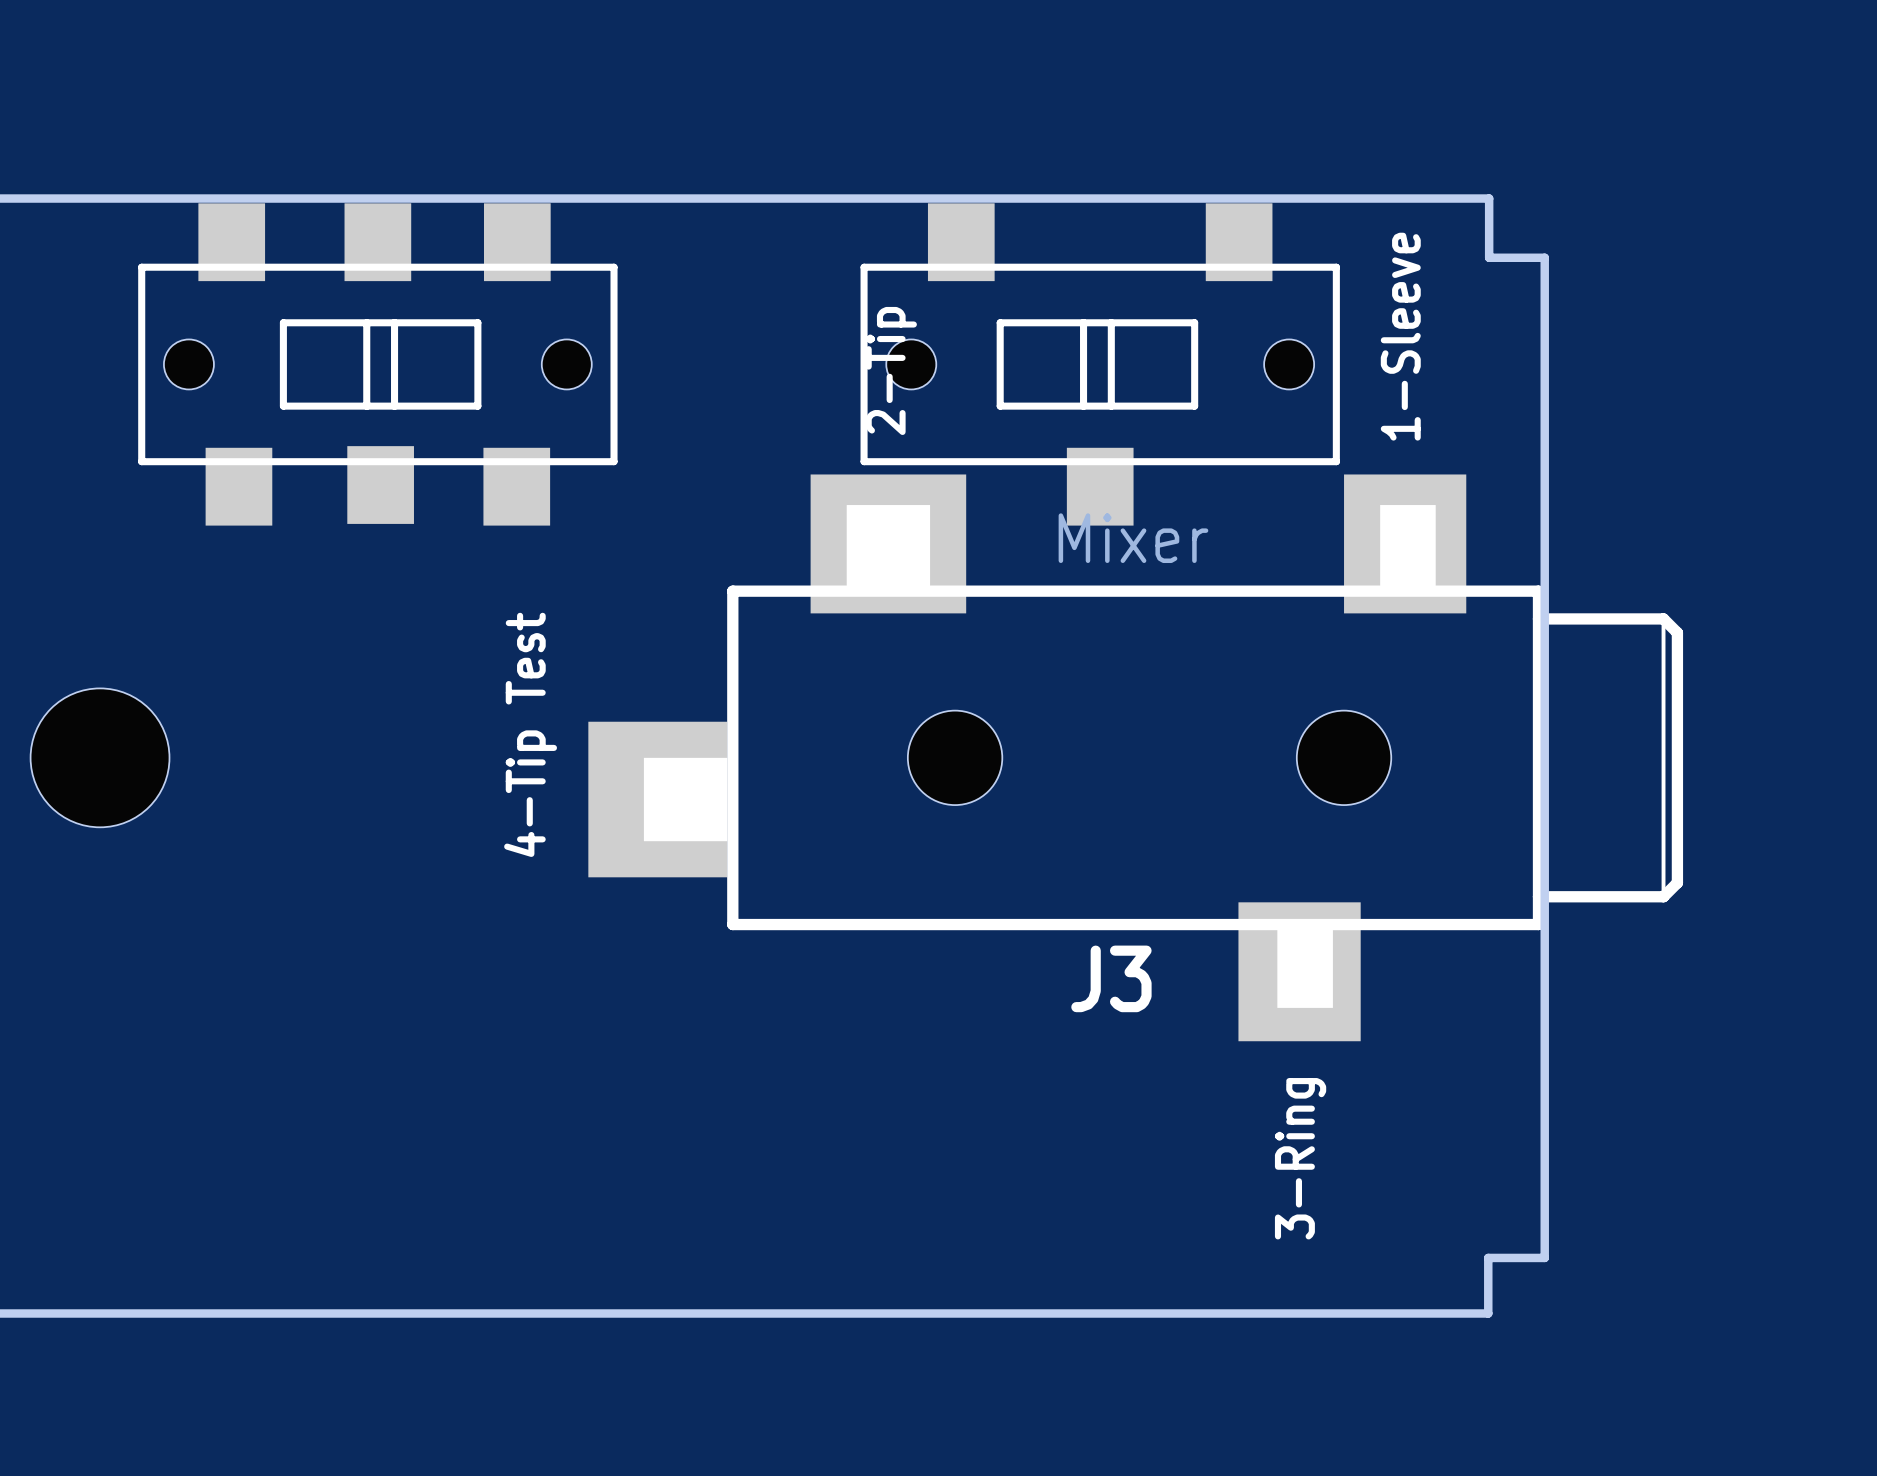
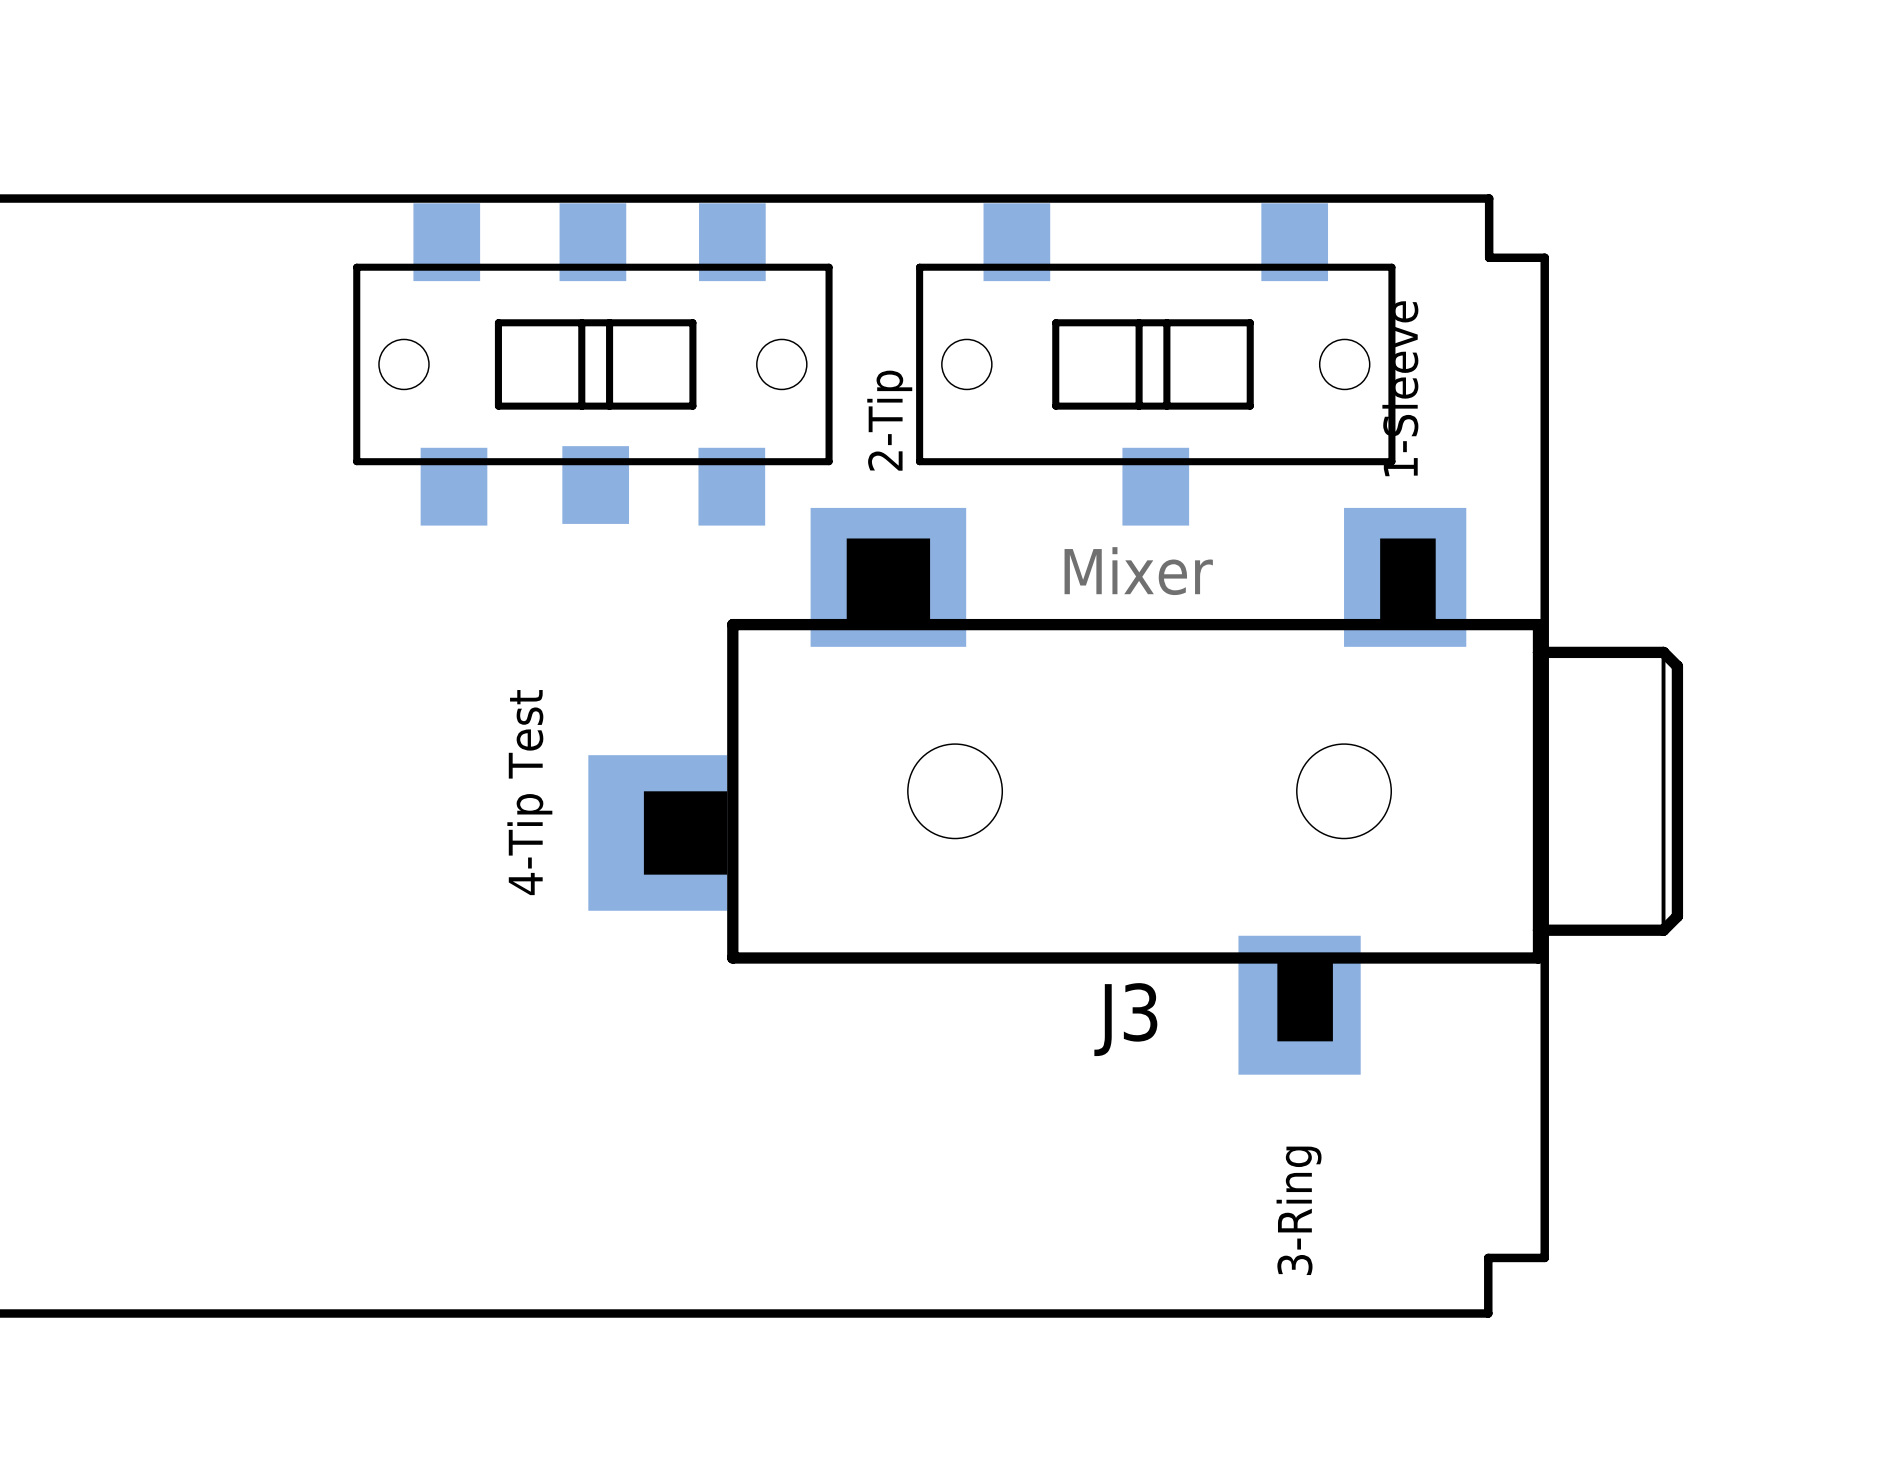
part position: (377, 364) -> (592, 364)
part position: (1100, 364) -> (1155, 364)
hole: (100, 757) -> none
J3 position: (1135, 757) -> (1135, 791)

